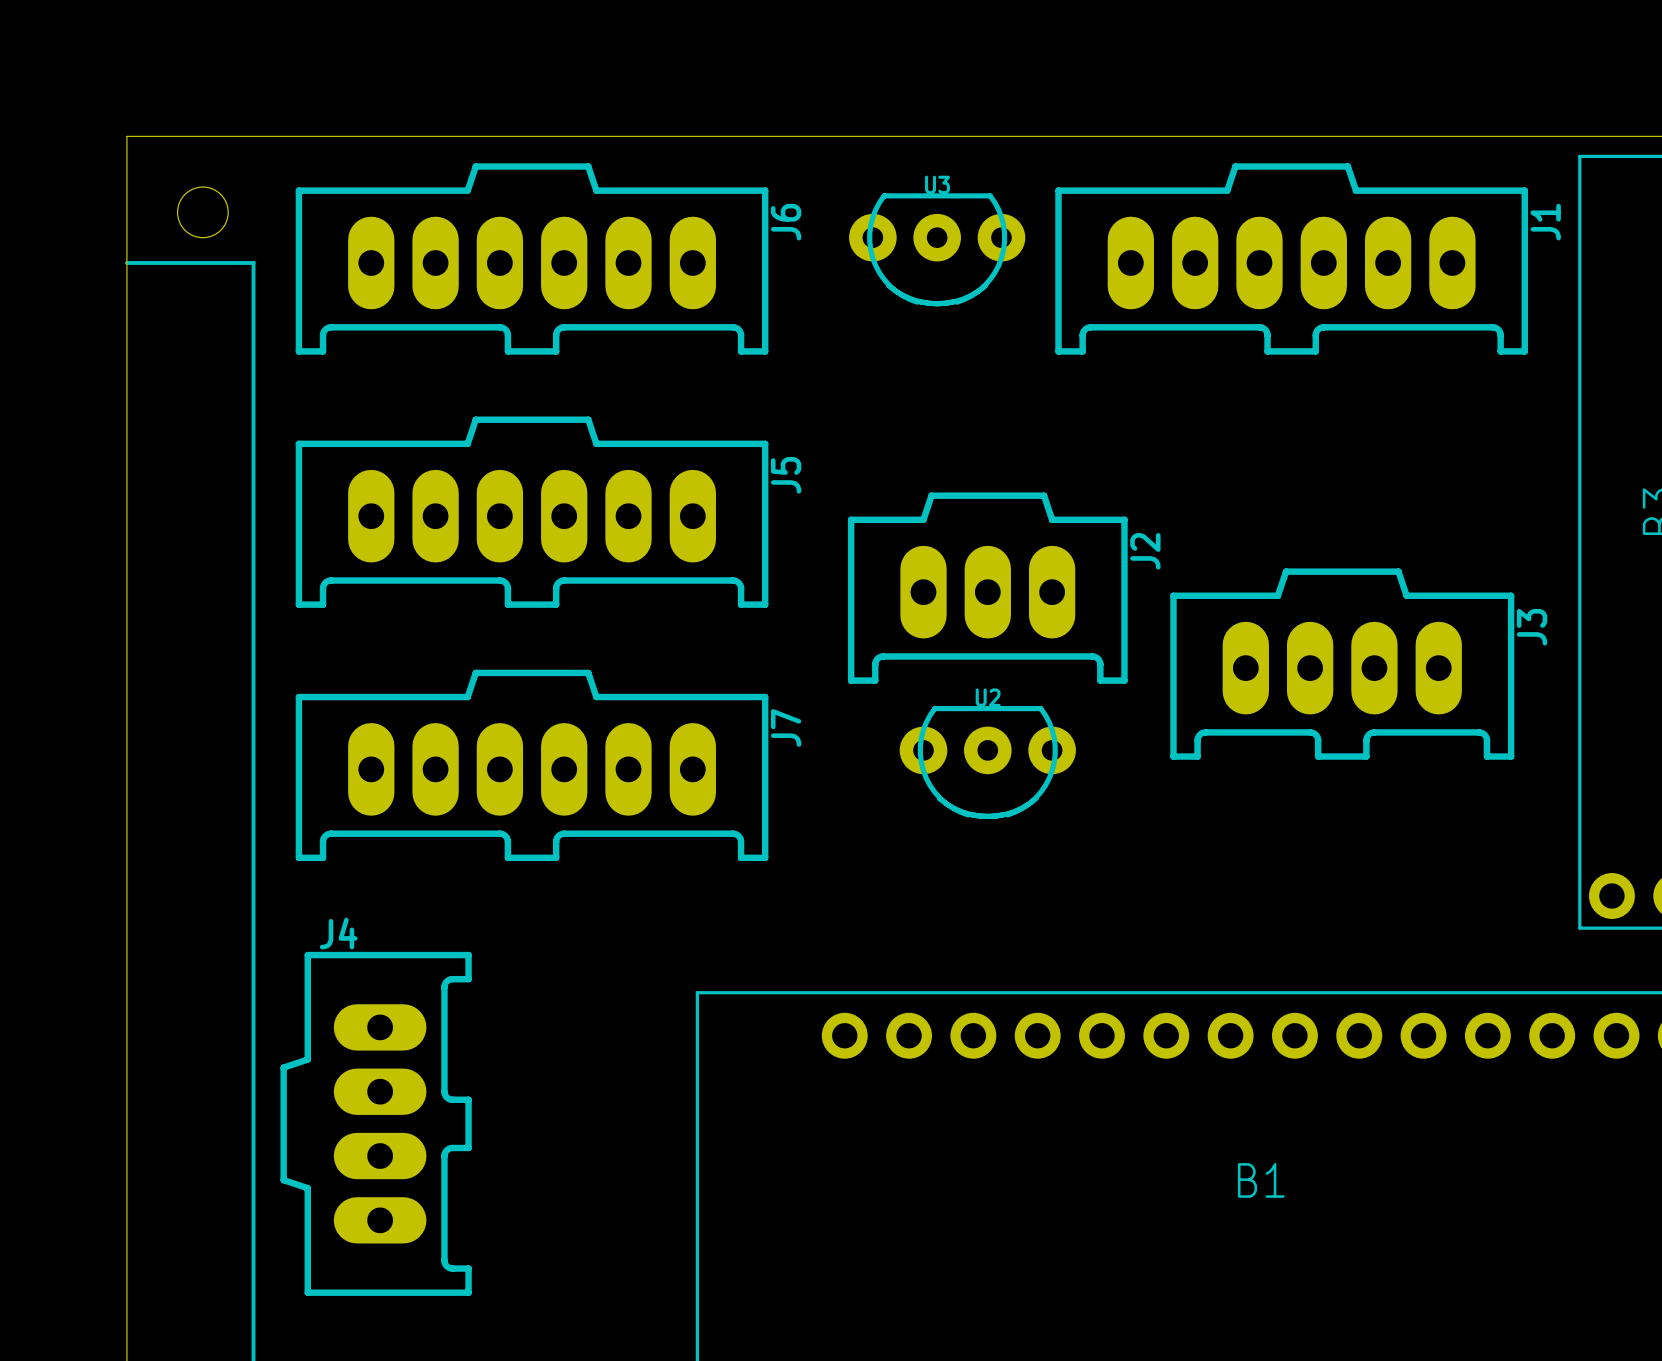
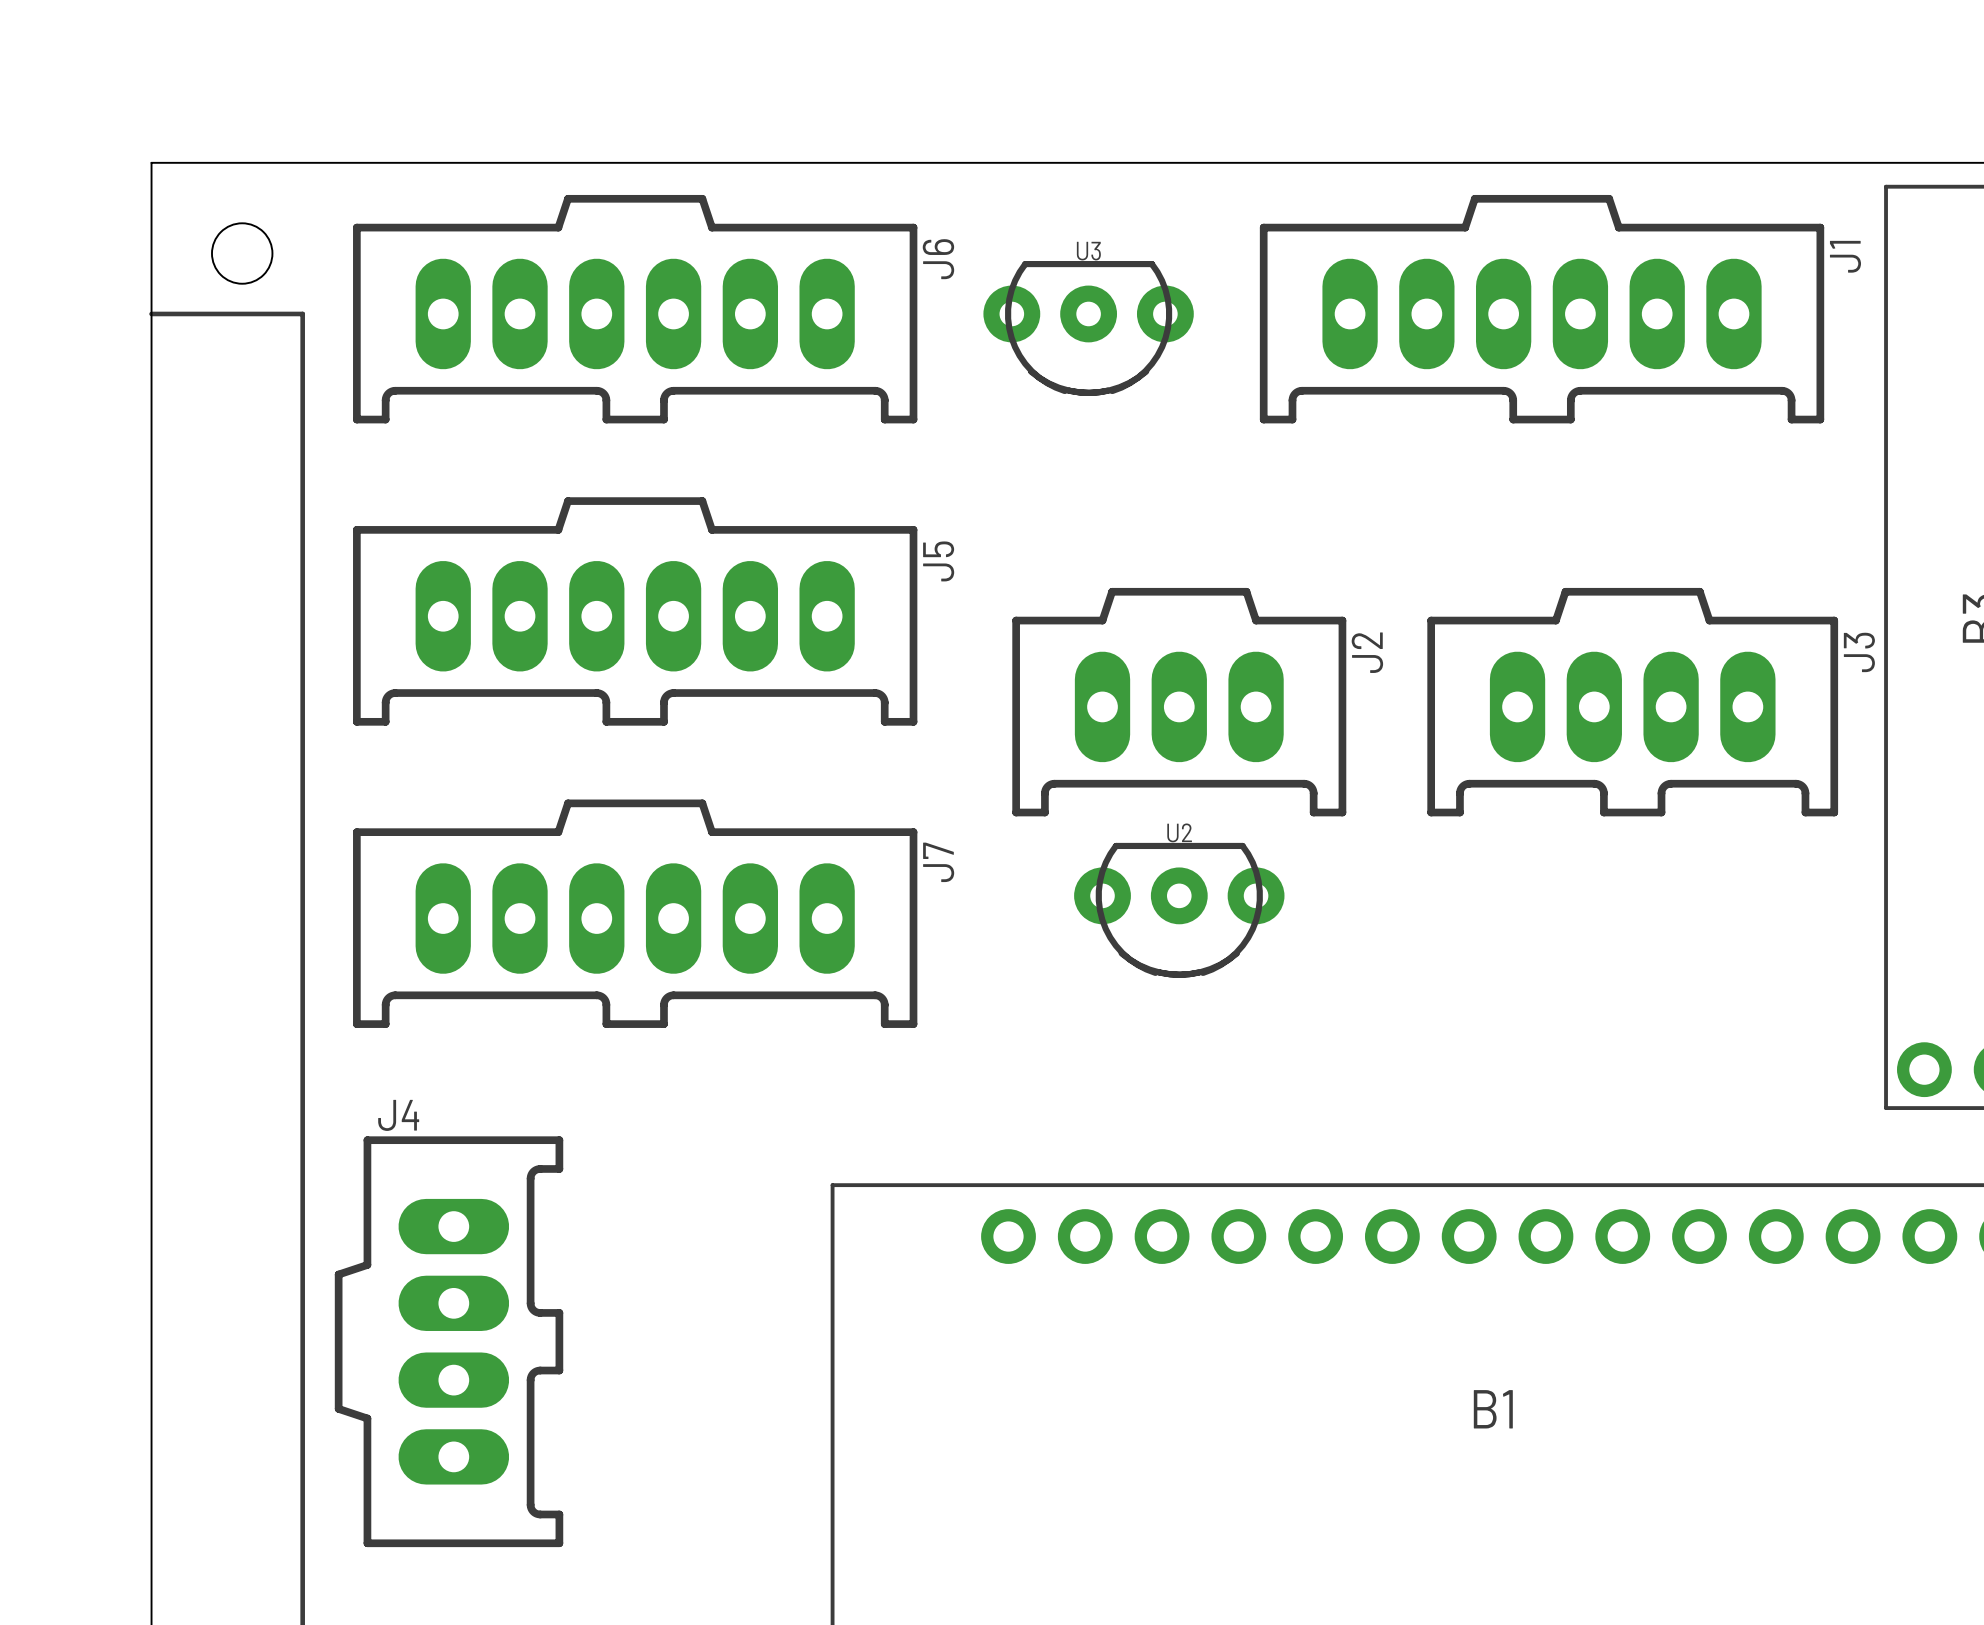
U3 position: (937, 249) -> (1088, 328)
J3 position: (1342, 664) -> (1632, 702)

